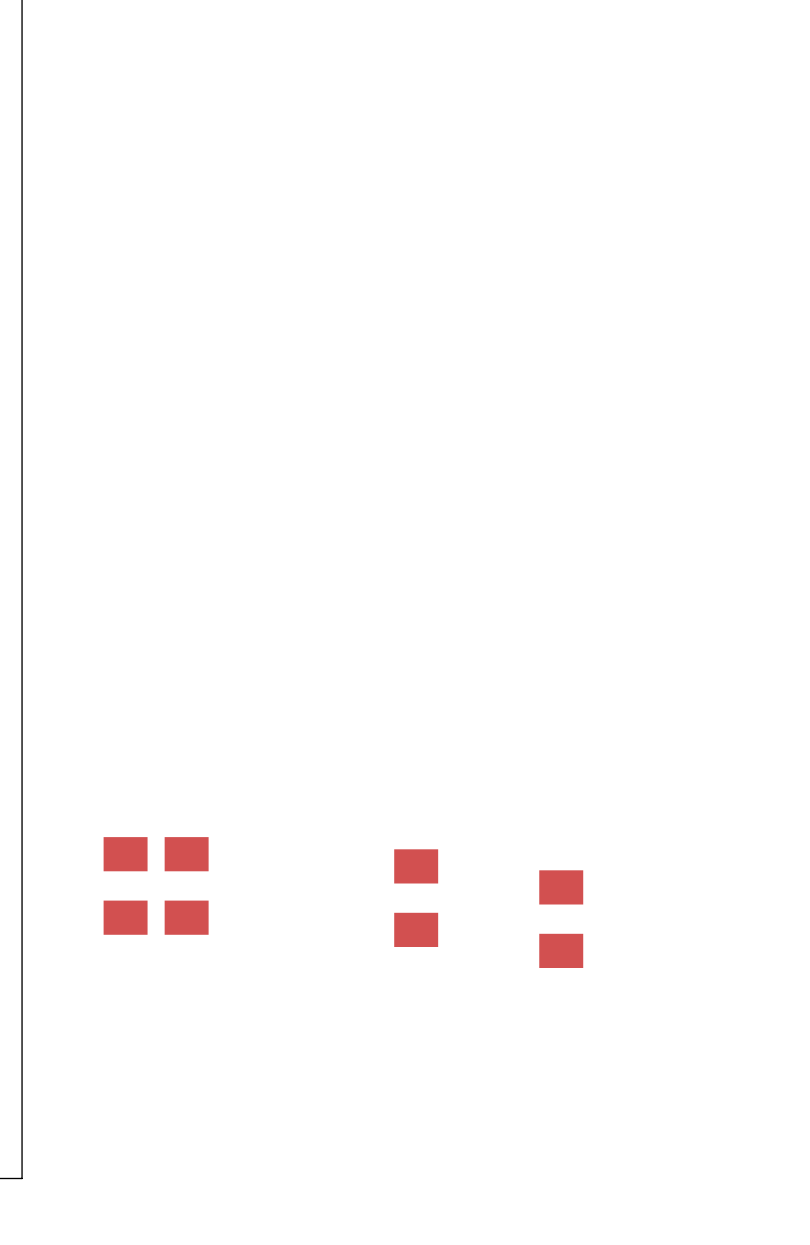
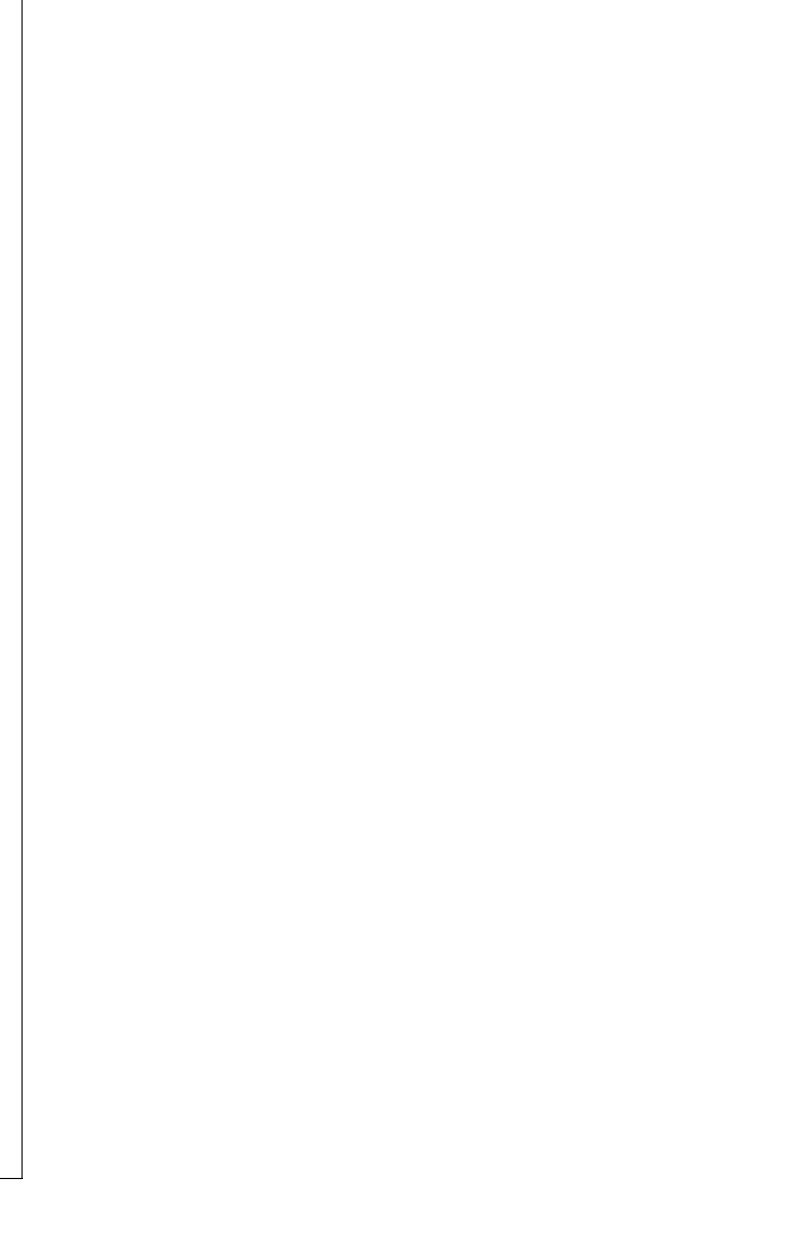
part: (125, 885) -> none
part: (186, 885) -> none
part: (416, 898) -> none
part: (561, 919) -> none

